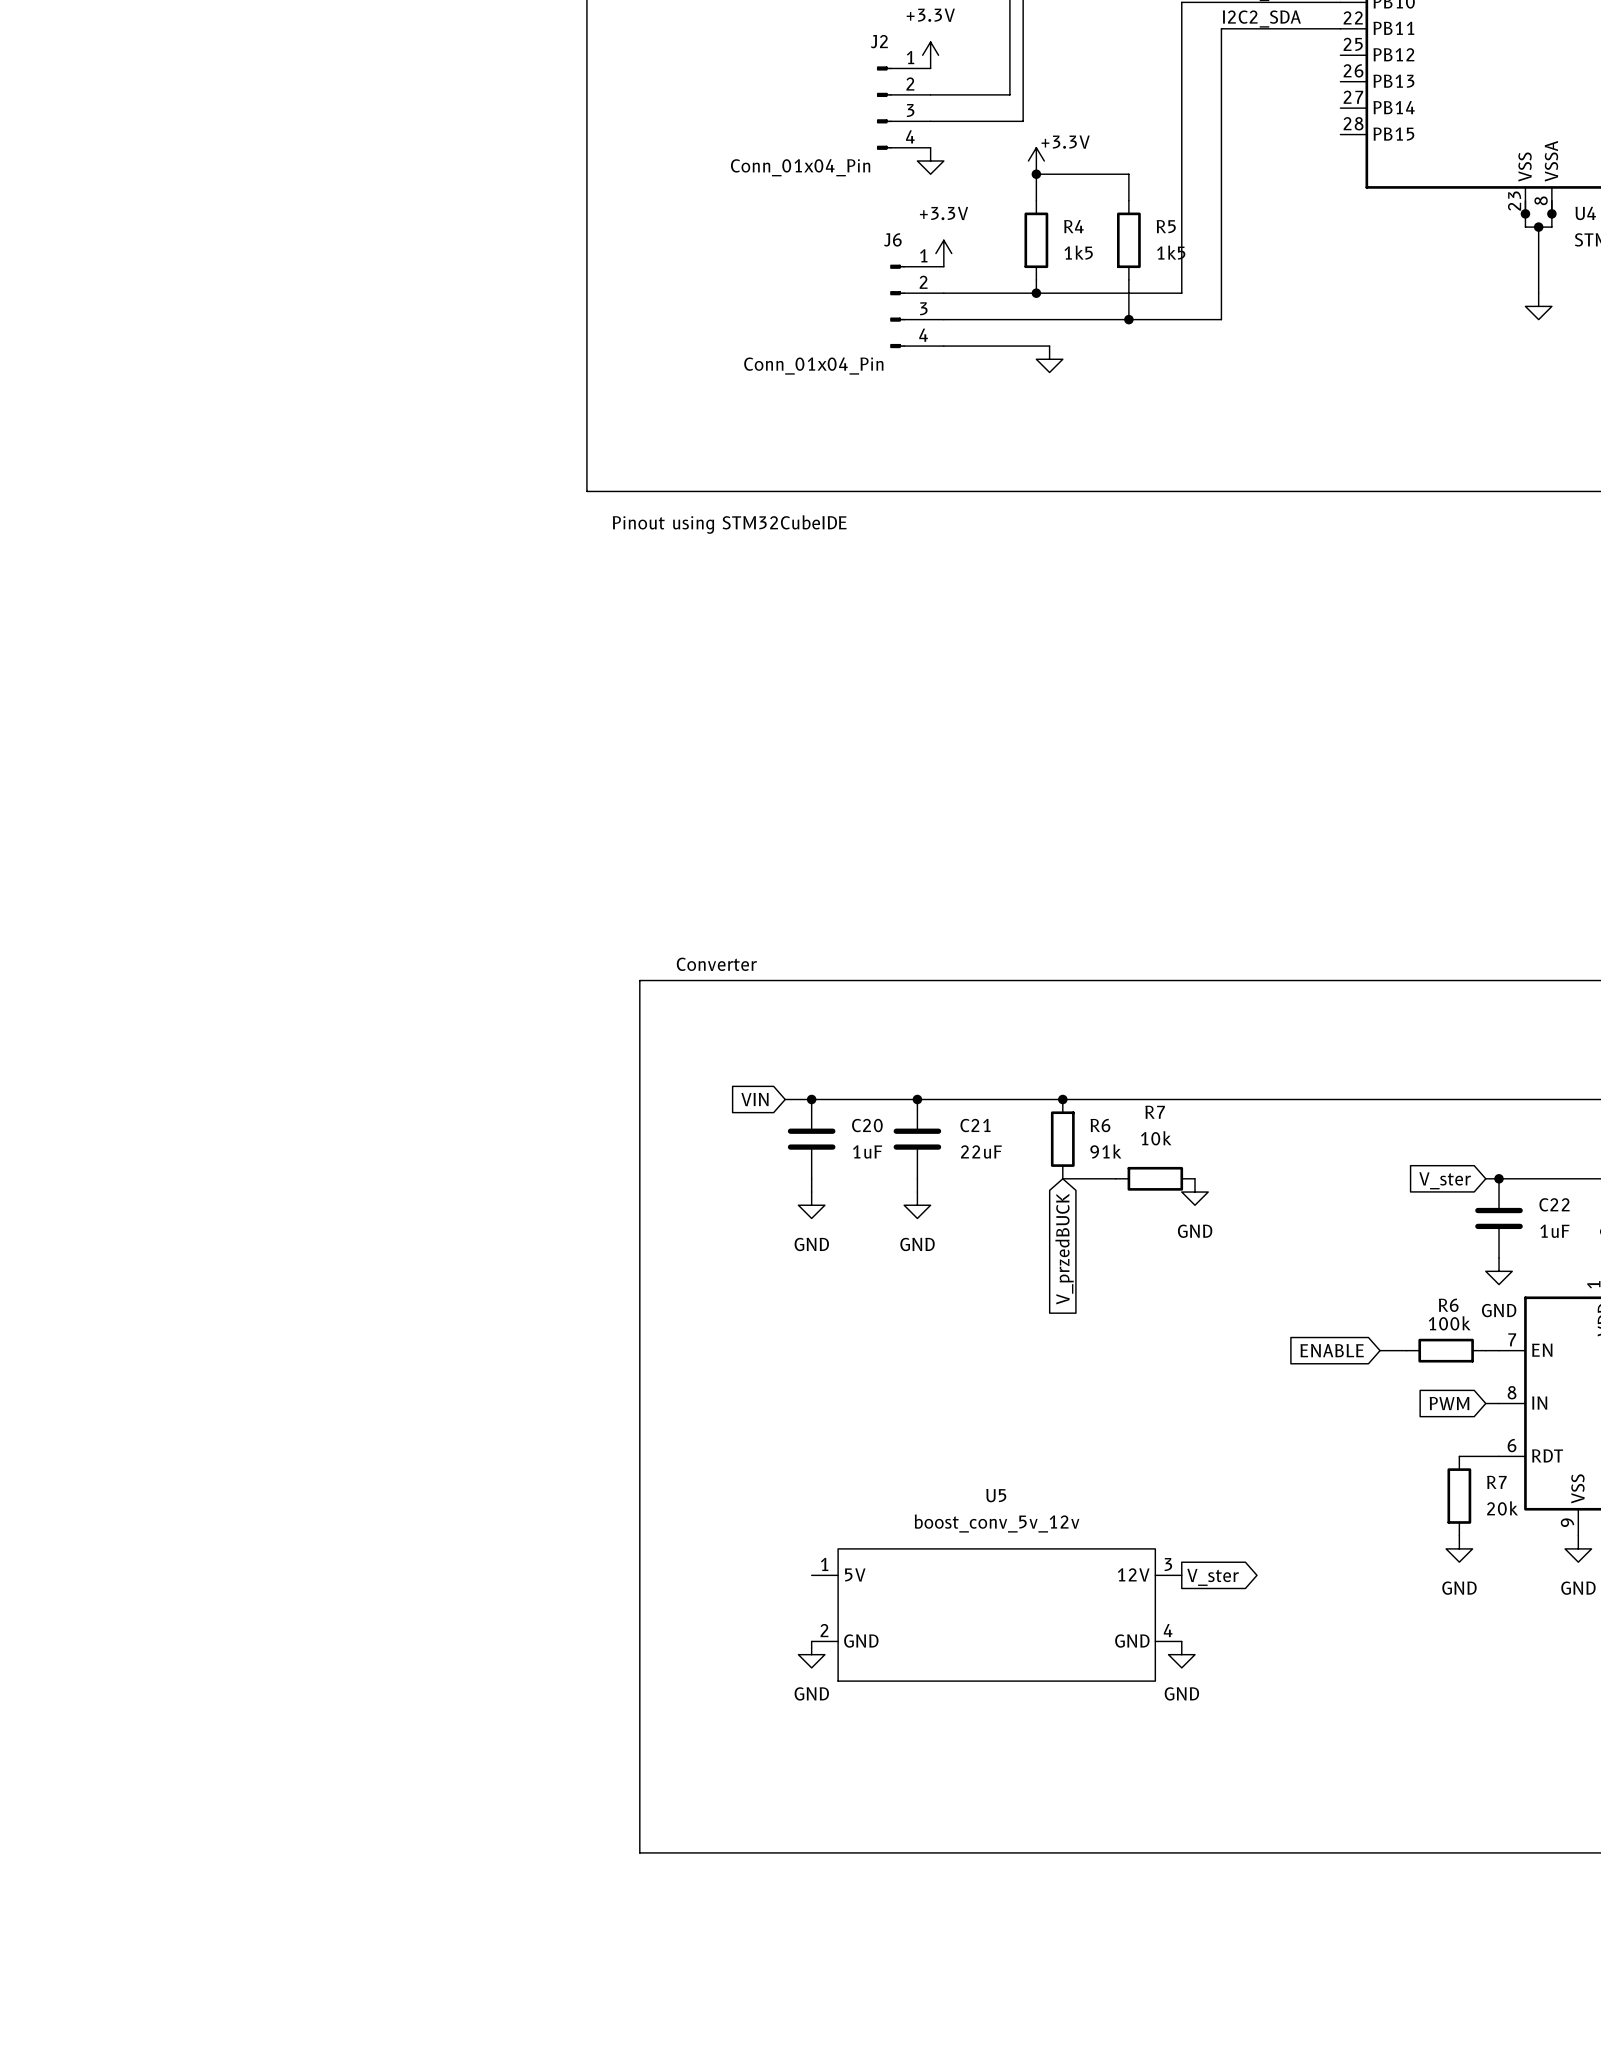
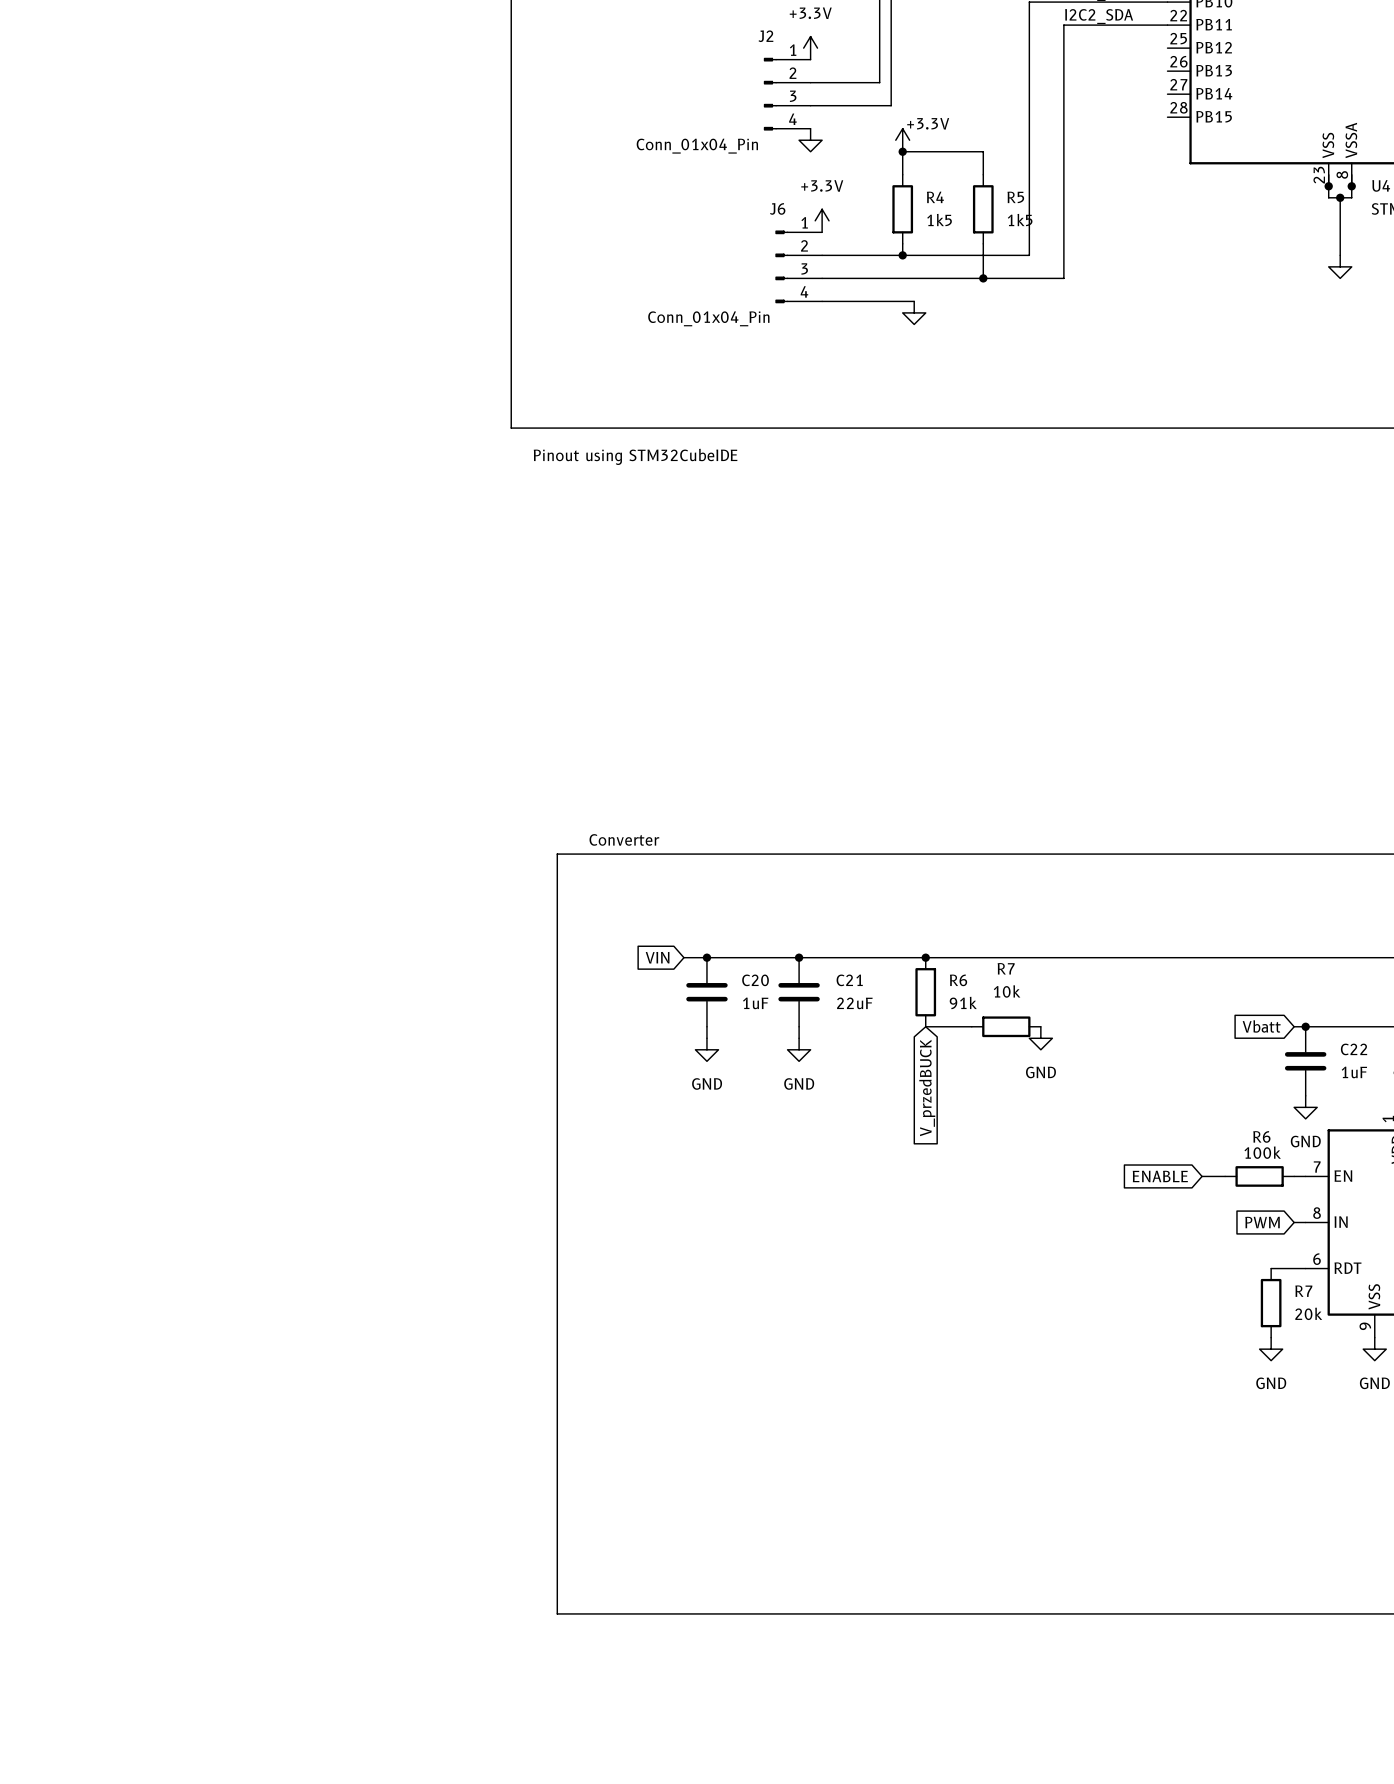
global label: V_ster (1445, 1180) -> Vbatt (1261, 1026)
global label: V_ster (1213, 1577) -> none
U5: boost_conv_5v_12v (996, 1615) -> none
power symbol: GND (811, 1654) -> none
power symbol: GND (1181, 1654) -> none

